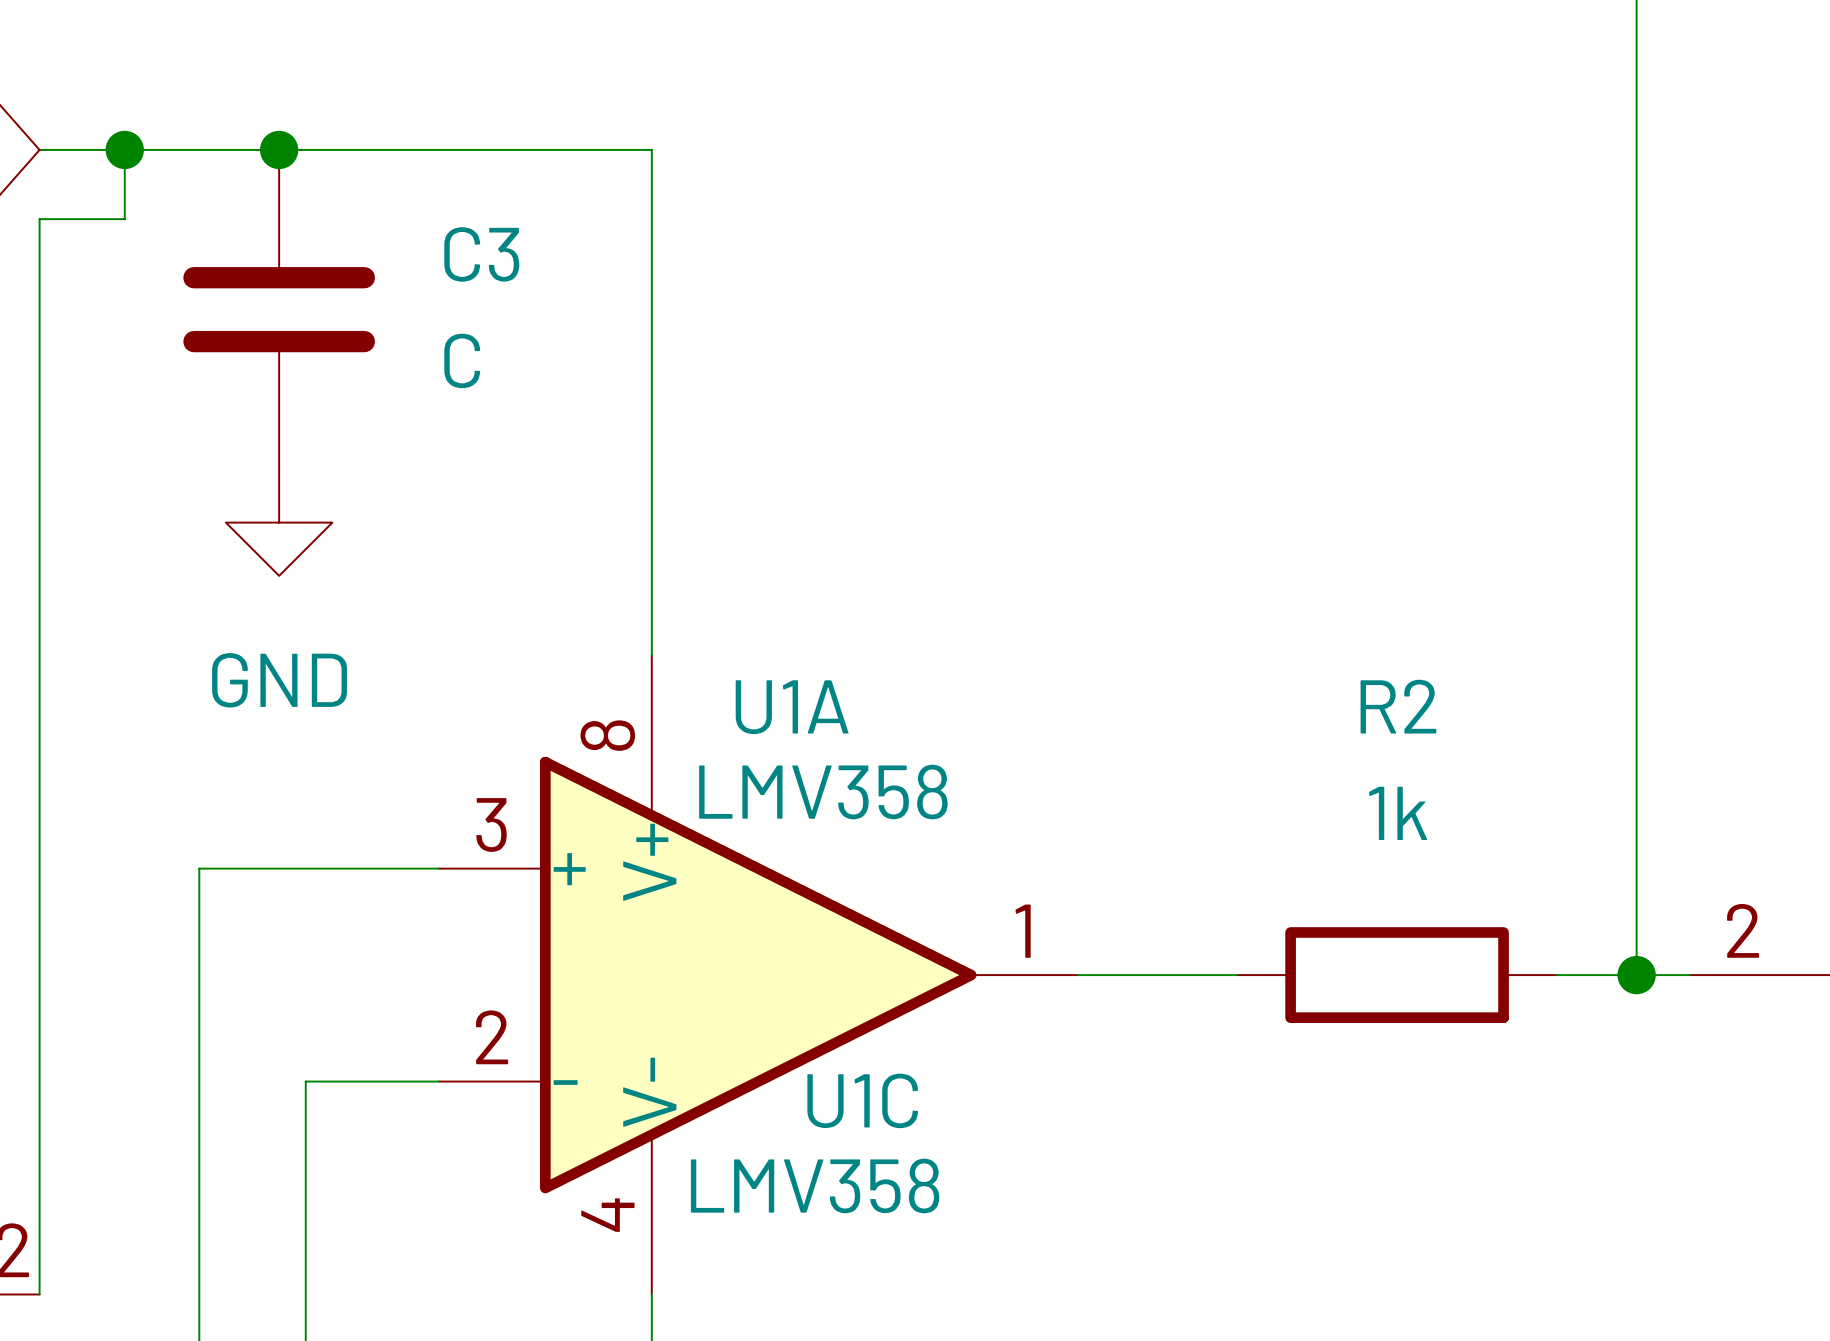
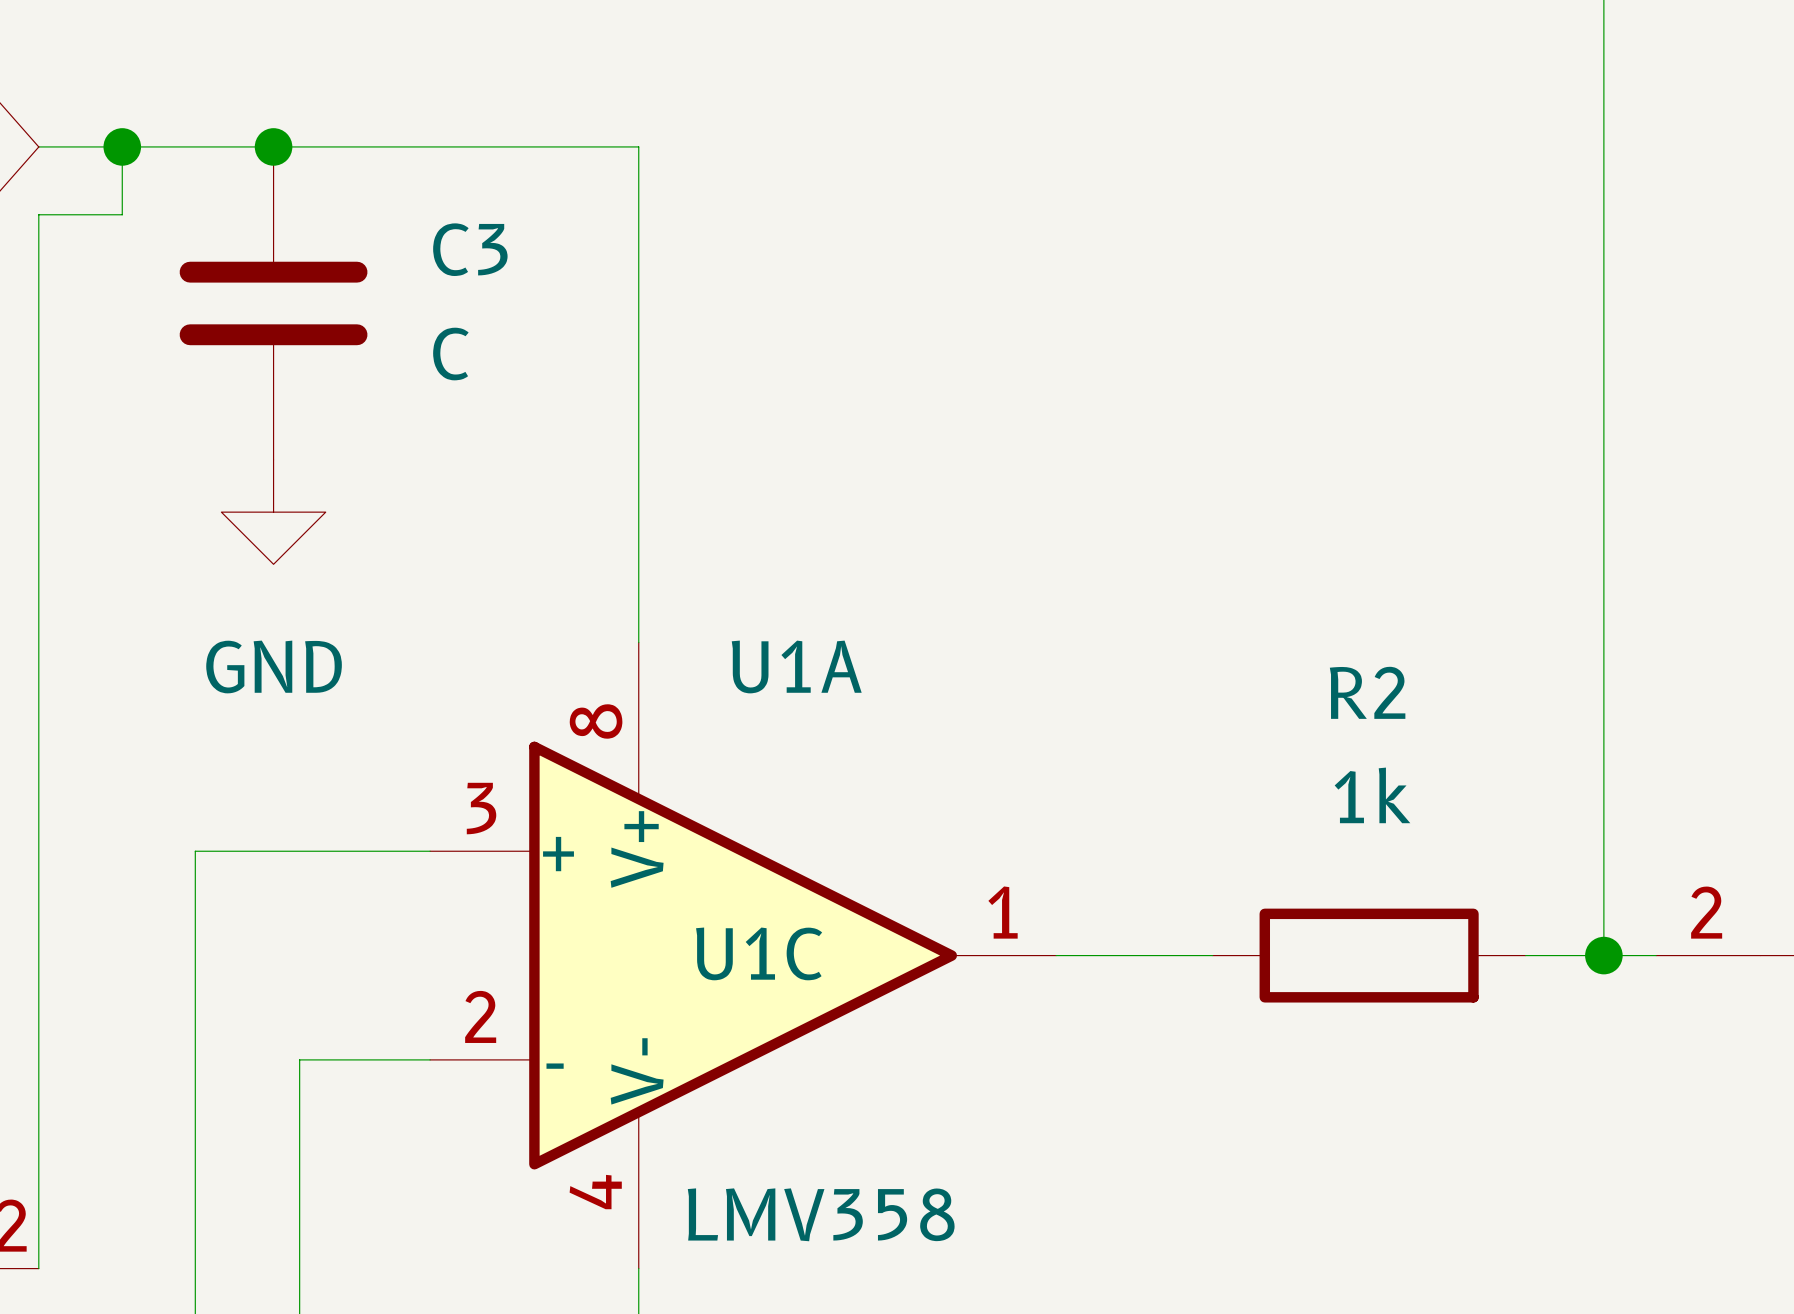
U1A name position: U1A (792, 707) -> U1A (796, 666)
U1A value position: LMV358 (823, 792) -> LMV358 (821, 1214)
U1C name position: U1C (862, 1100) -> U1C (759, 953)
U1C value: LMV358 (815, 1185) -> none

